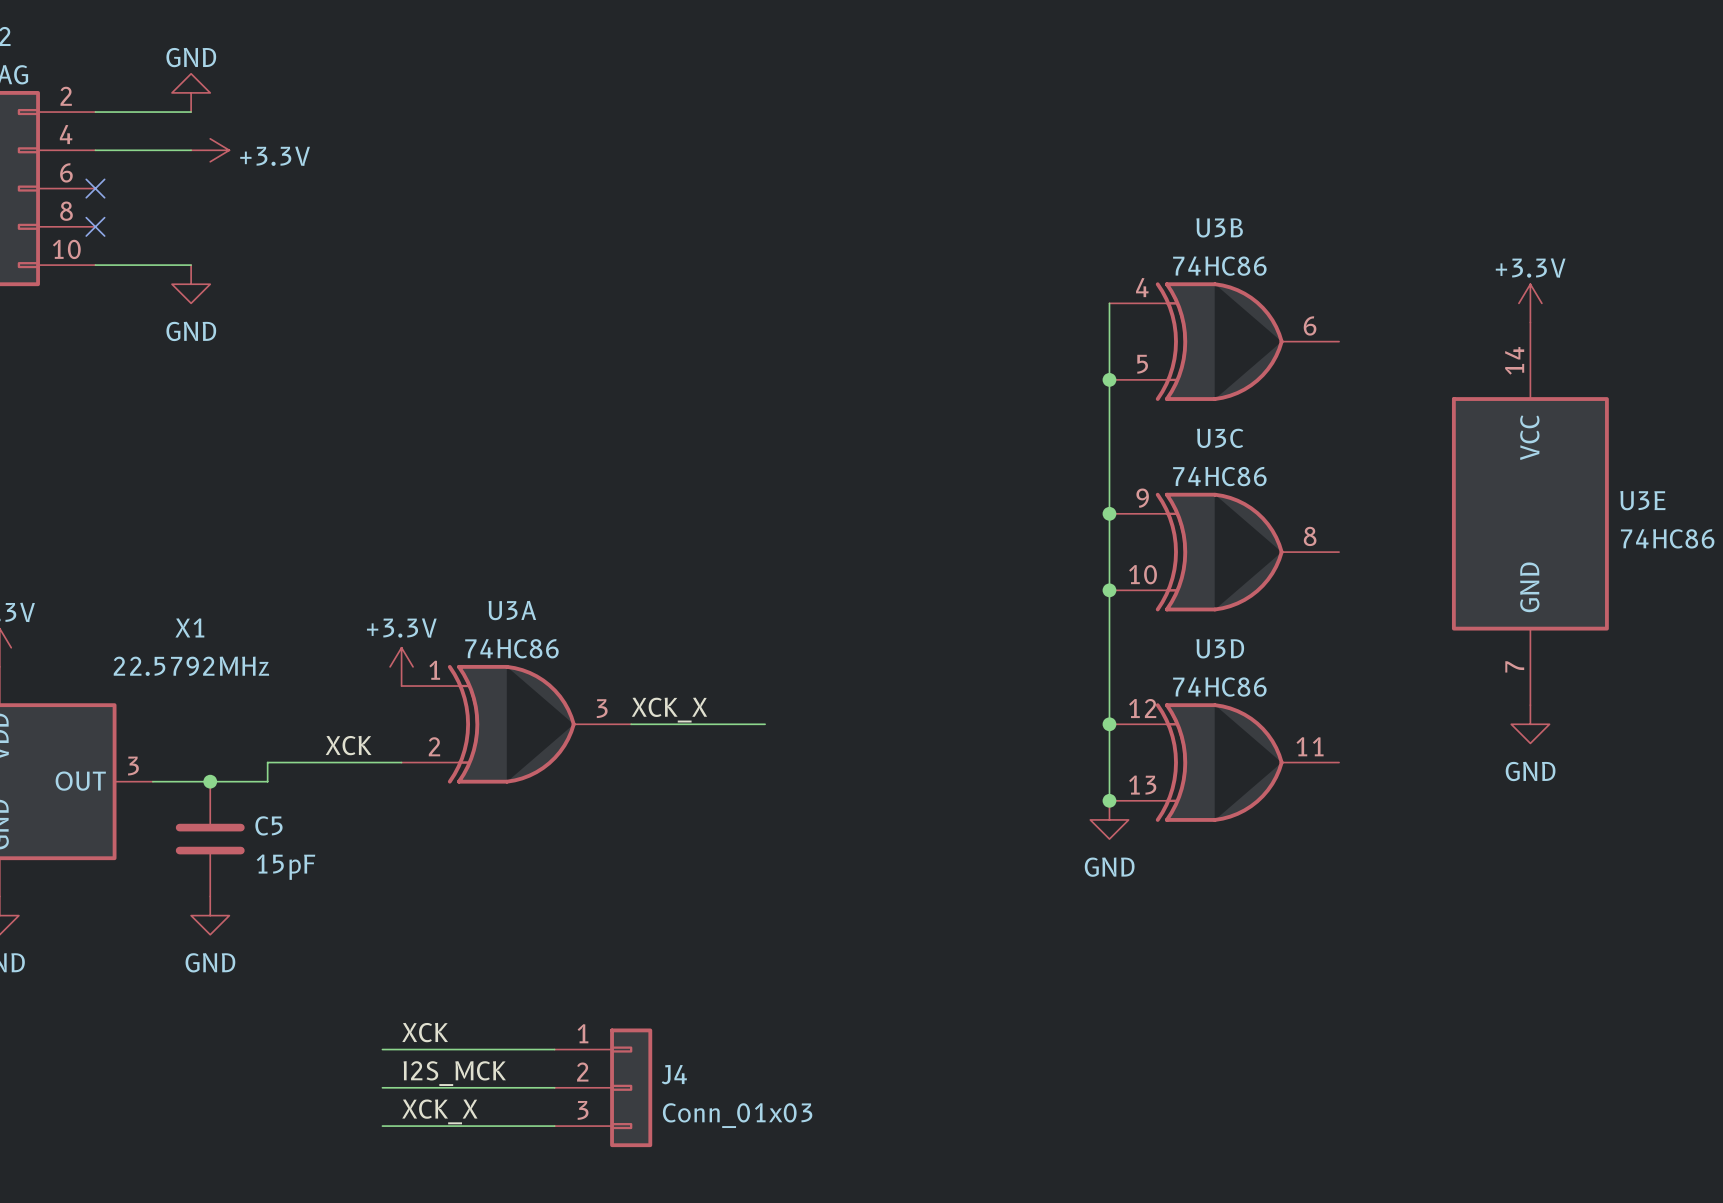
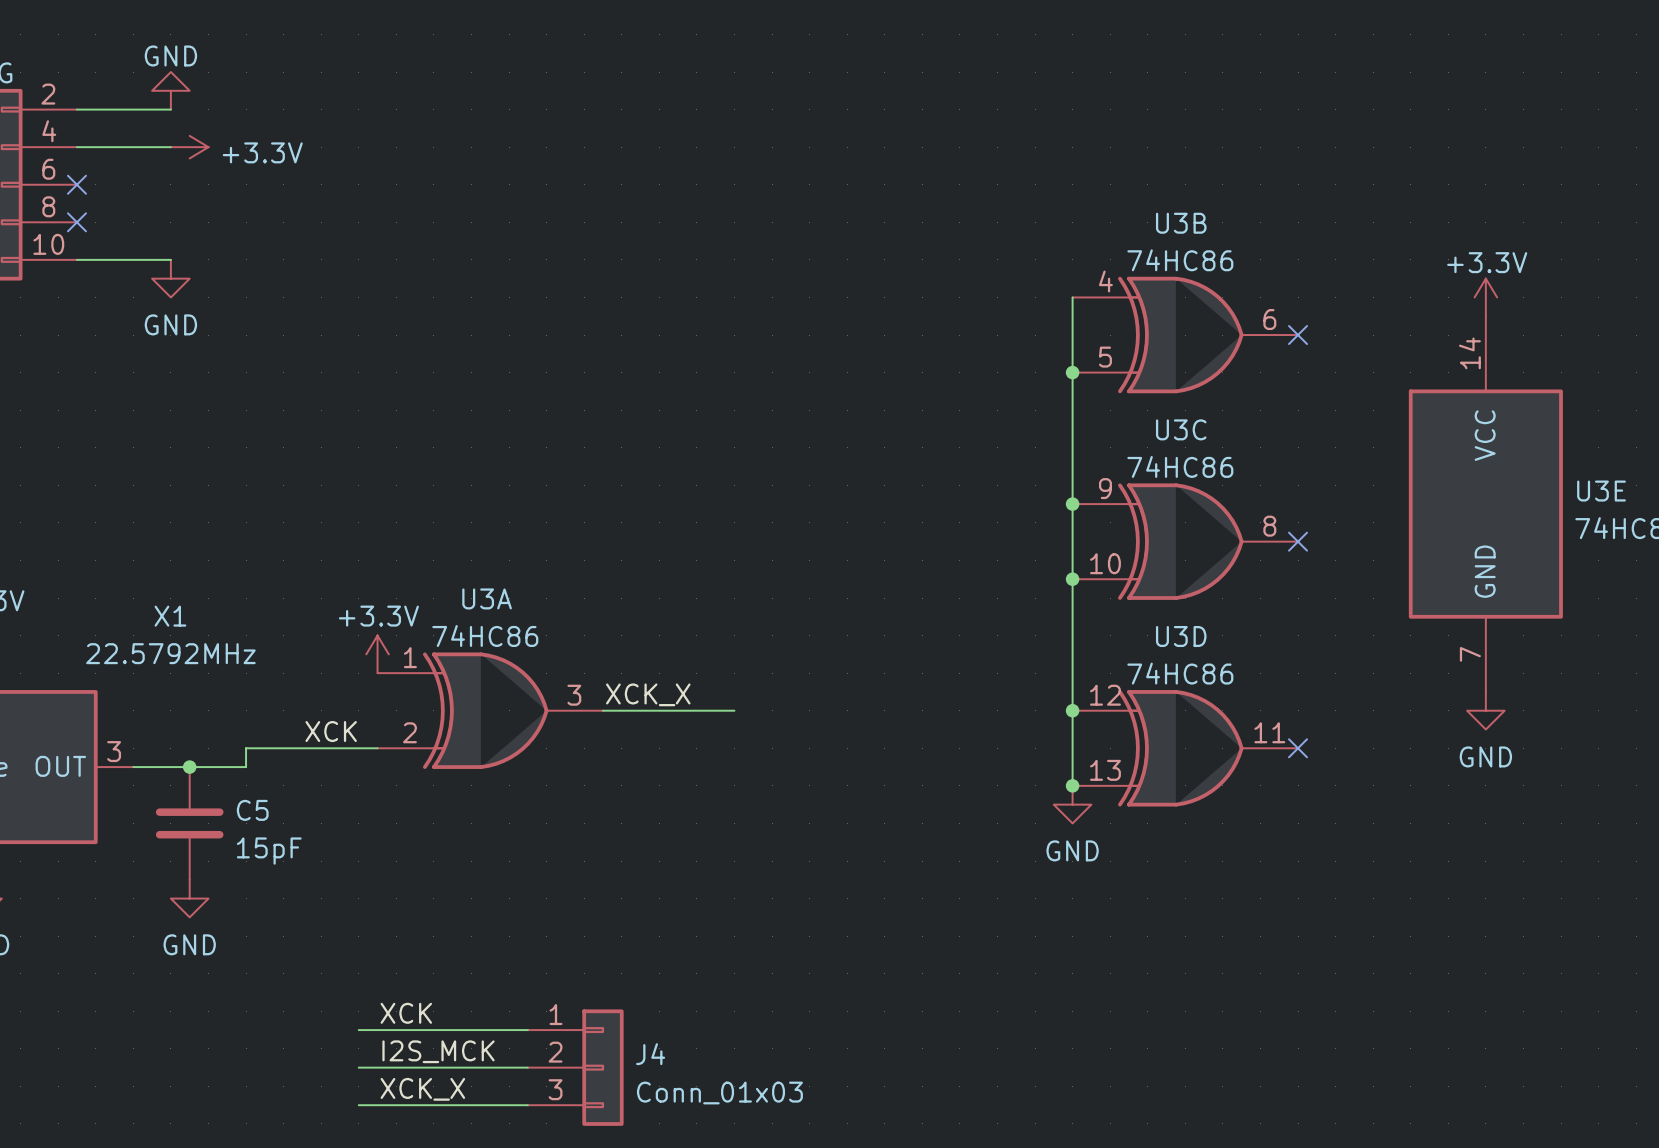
no-connect mark: none -> (1298, 335)
no-connect mark: none -> (1298, 541)
no-connect mark: none -> (1298, 748)

